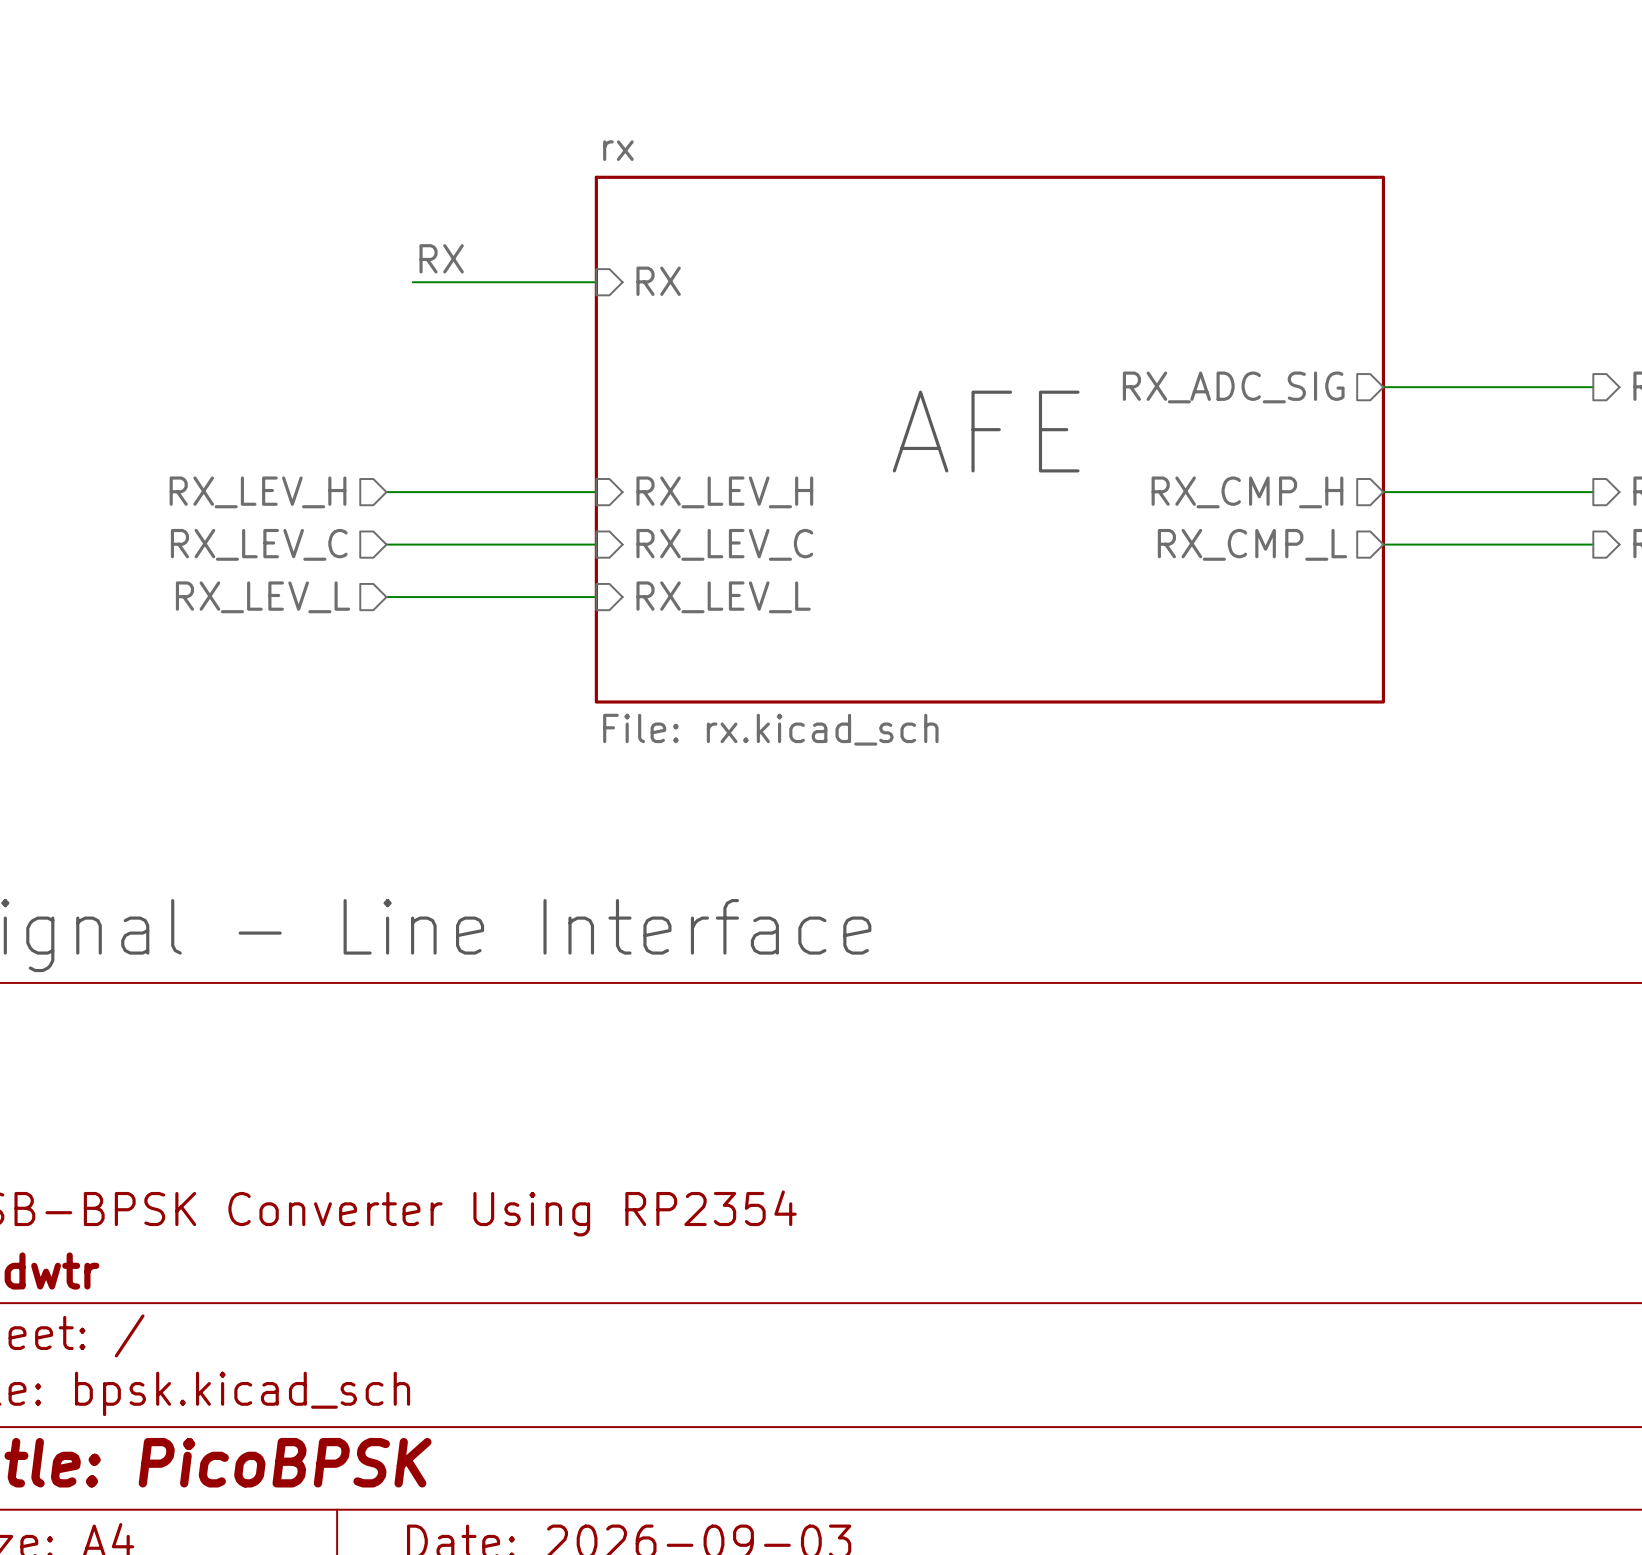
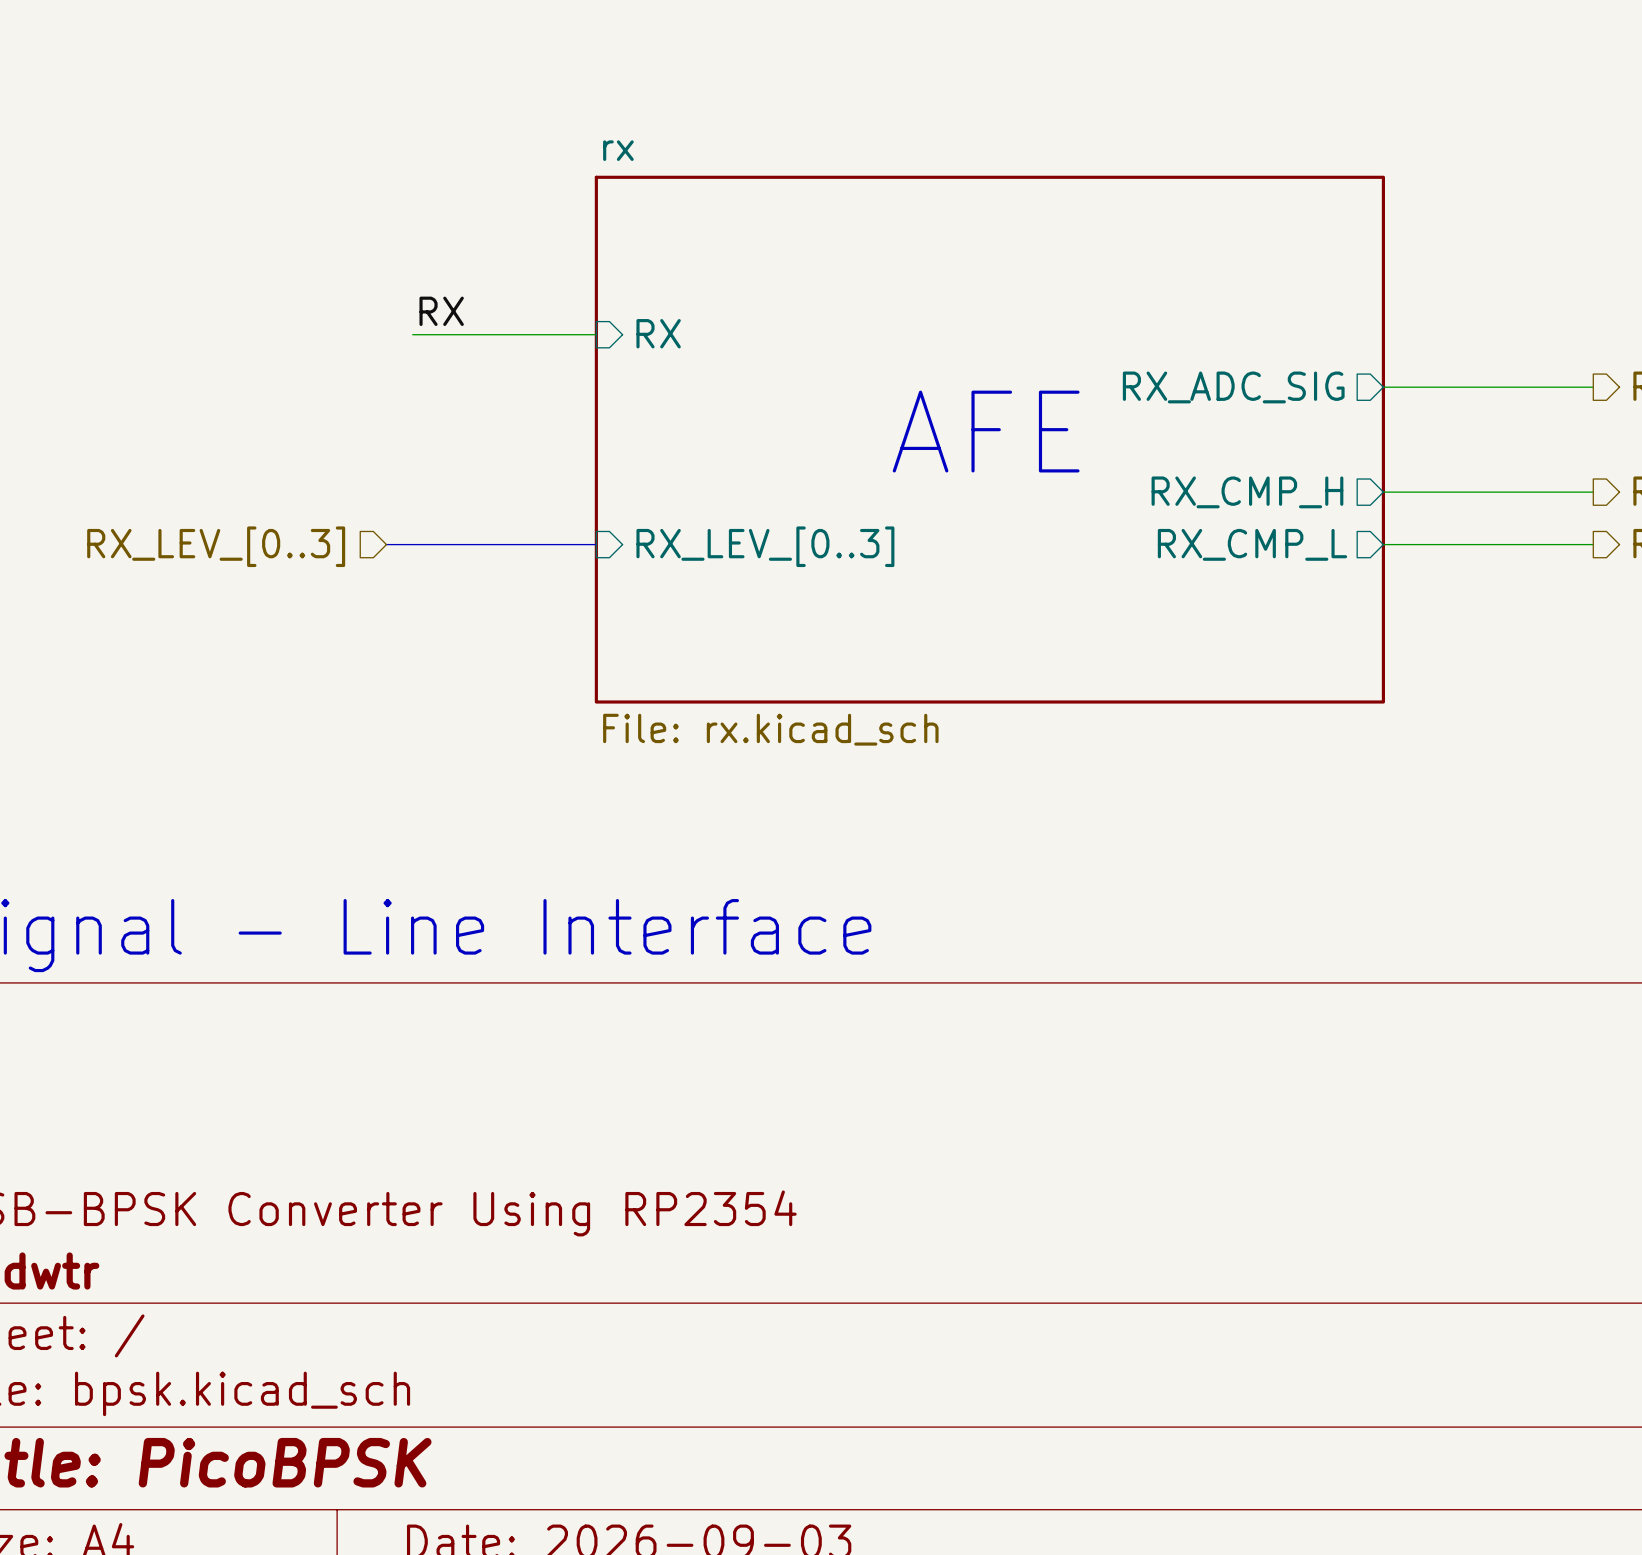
label position: RX (441, 258) -> RX (441, 311)
sheet pin position: RX (658, 281) -> RX (658, 333)
wire: (412, 282) (596, 282) -> (412, 334) (596, 334)
hierarchical label: RX_LEV_H (258, 492) -> none
wire: (386, 492) (596, 492) -> none
sheet pin: RX_LEV_H (724, 492) -> none
hierarchical label: RX_LEV_C (259, 544) -> RX_LEV_[0..3] (216, 546)
bus: none -> (386, 544) (596, 544)
sheet pin: RX_LEV_C (724, 544) -> RX_LEV_[0..3] (765, 546)
hierarchical label: RX_LEV_L (263, 597) -> none
wire: (386, 597) (596, 597) -> none
sheet pin: RX_LEV_L (723, 597) -> none

